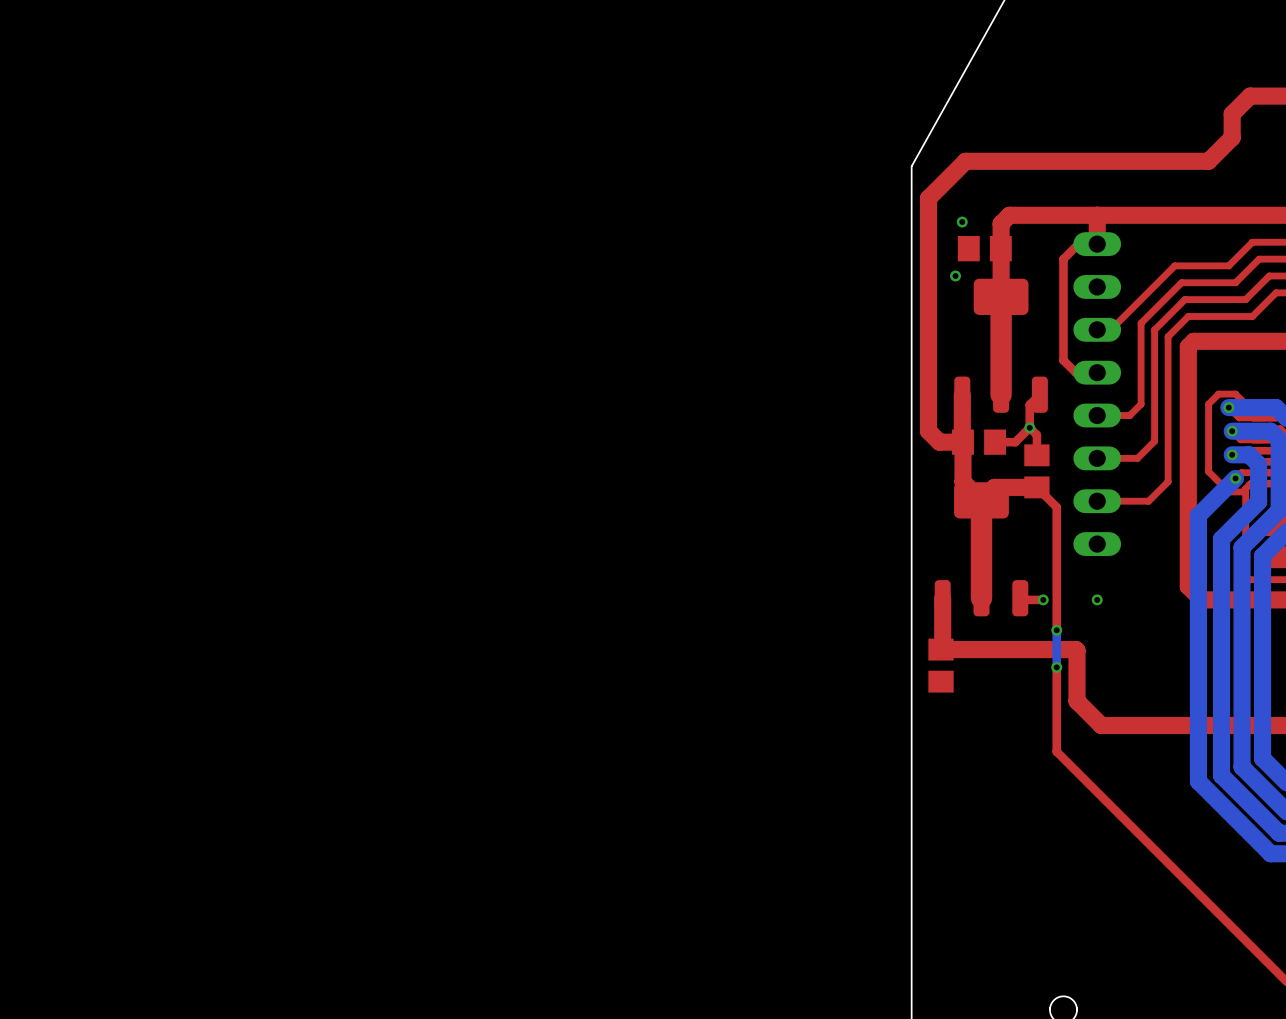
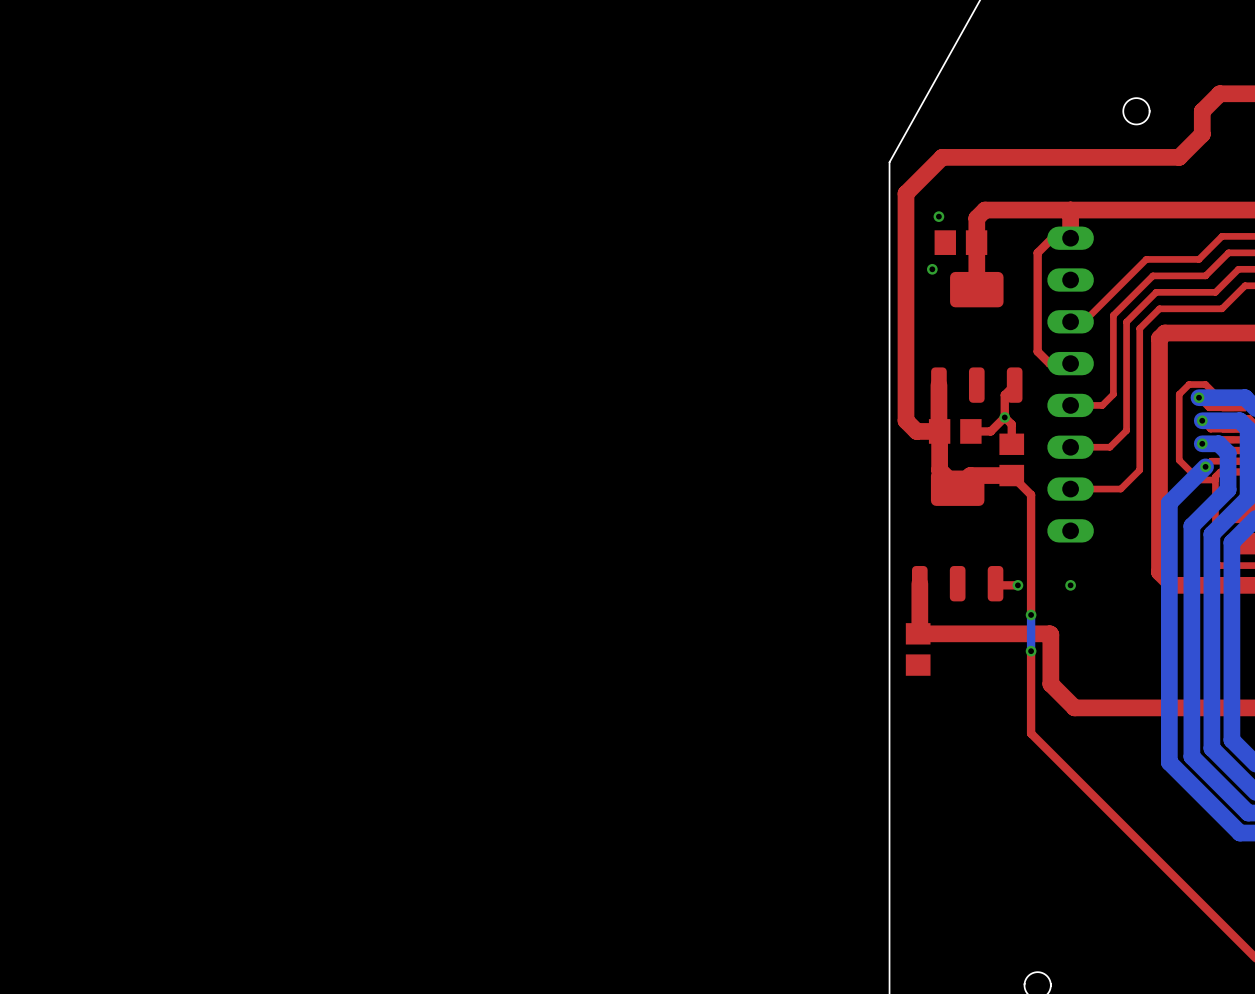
board edge: none -> (1149, 110) (1145, 120) (1136, 124) (1127, 120) (1123, 111) (1127, 102) (1136, 98) (1145, 101) (1149, 110)
top track: (1001, 296) (1001, 394) -> none
top track: (981, 500) (981, 598) -> none

